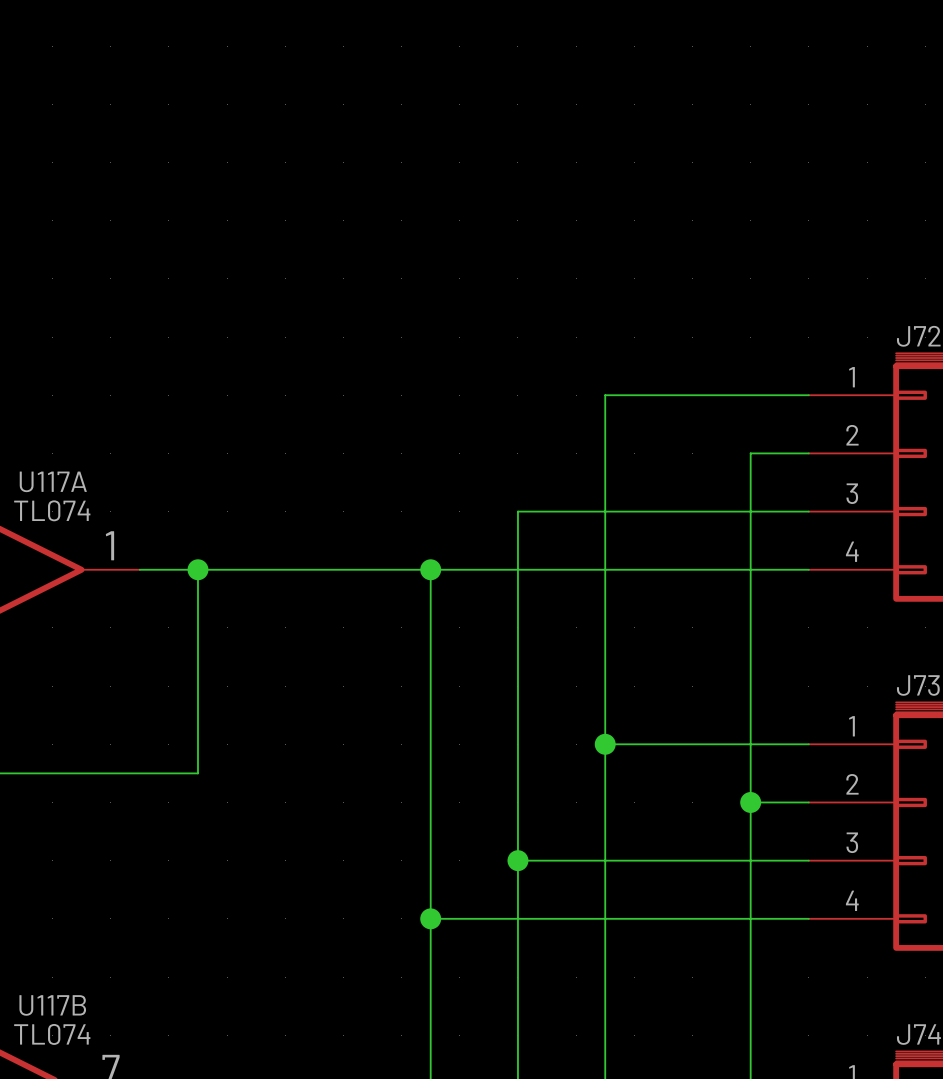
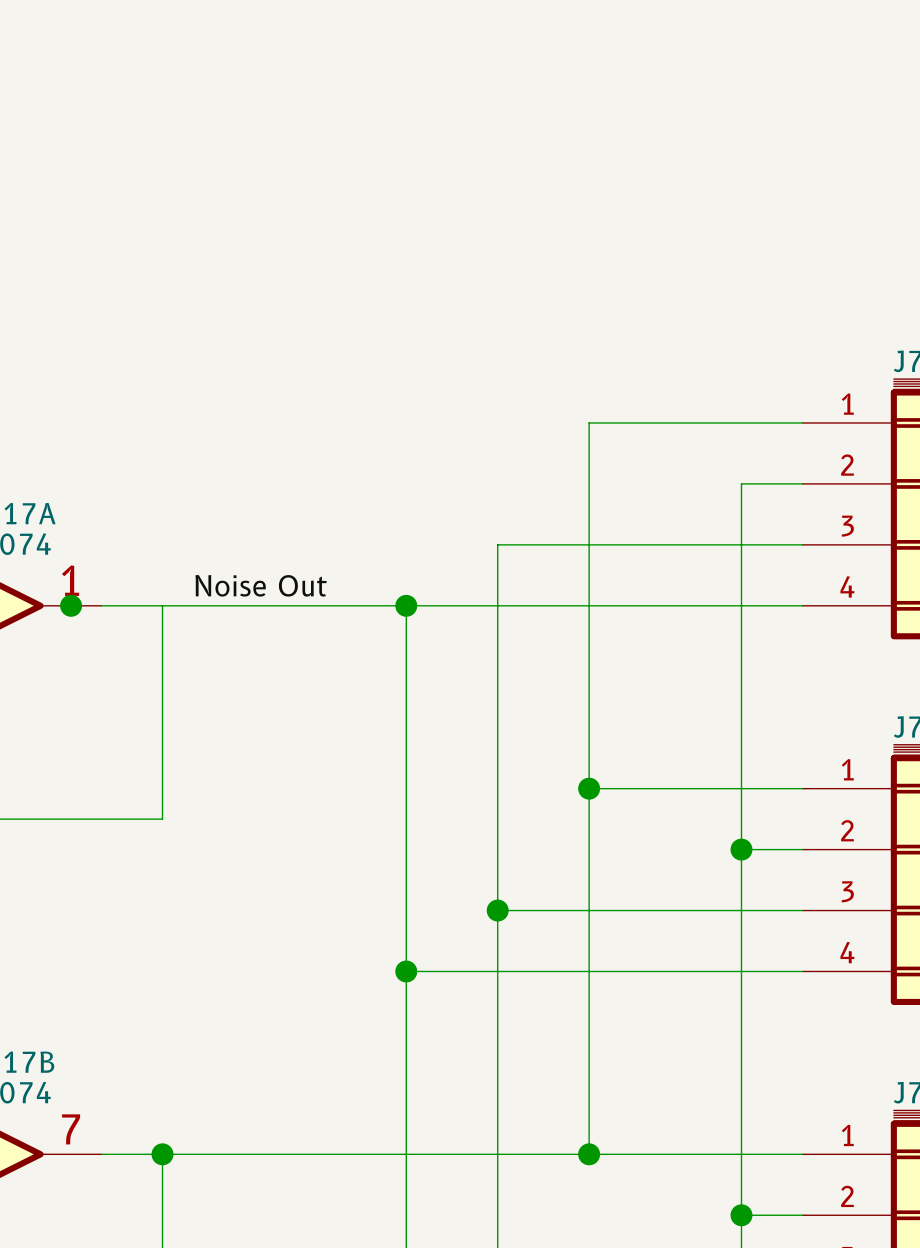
label: none -> Noise Out (261, 585)
junction position: (197, 569) -> (71, 605)

